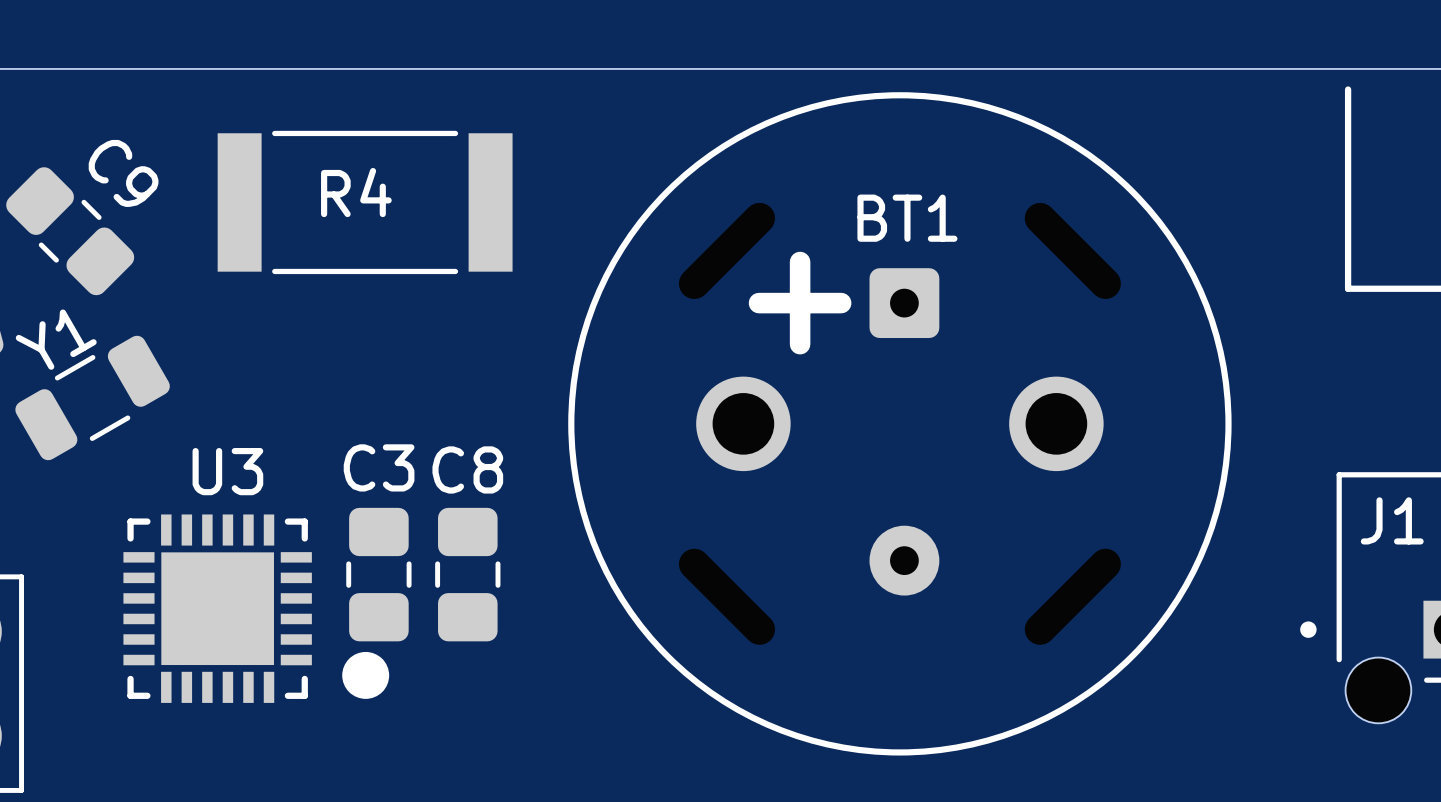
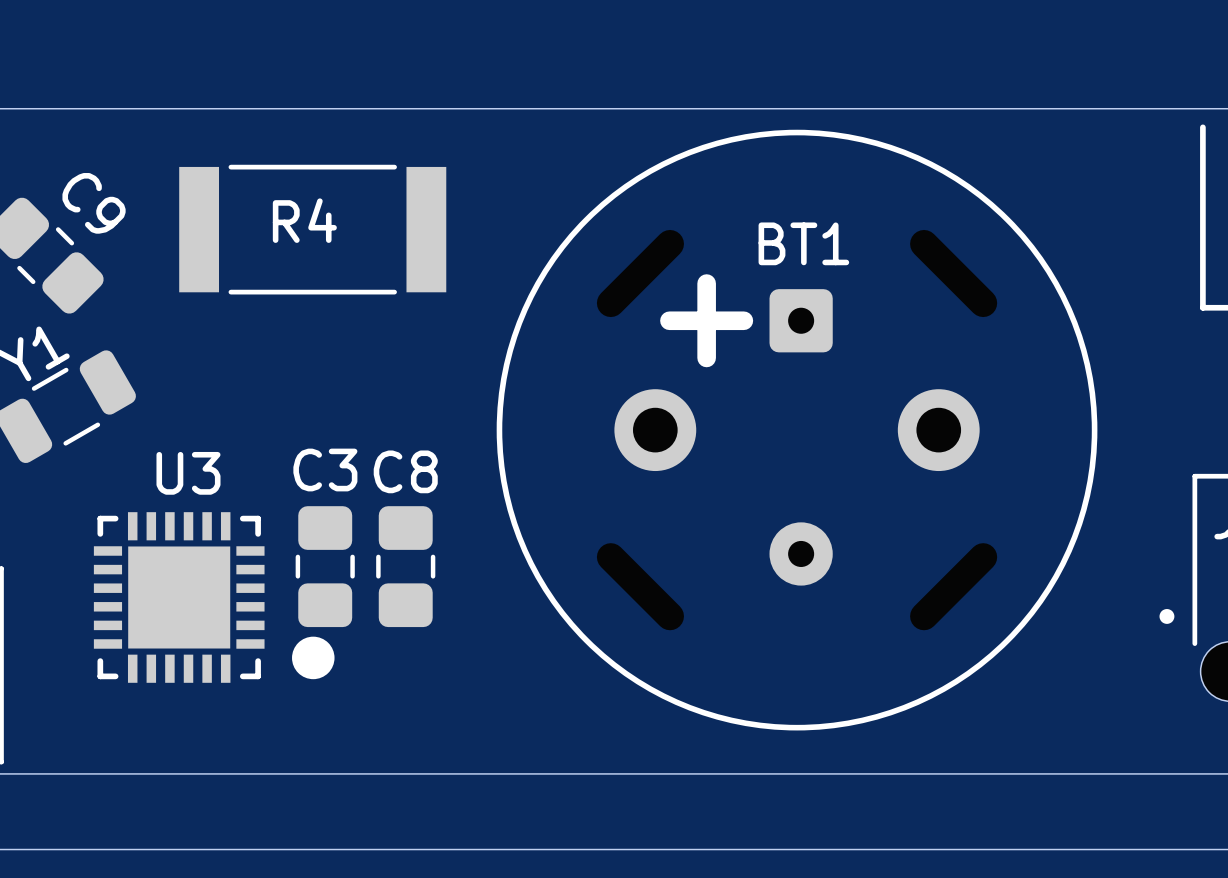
part footprint: [568, 92, 1232, 756] -> [496, 129, 1098, 731]

